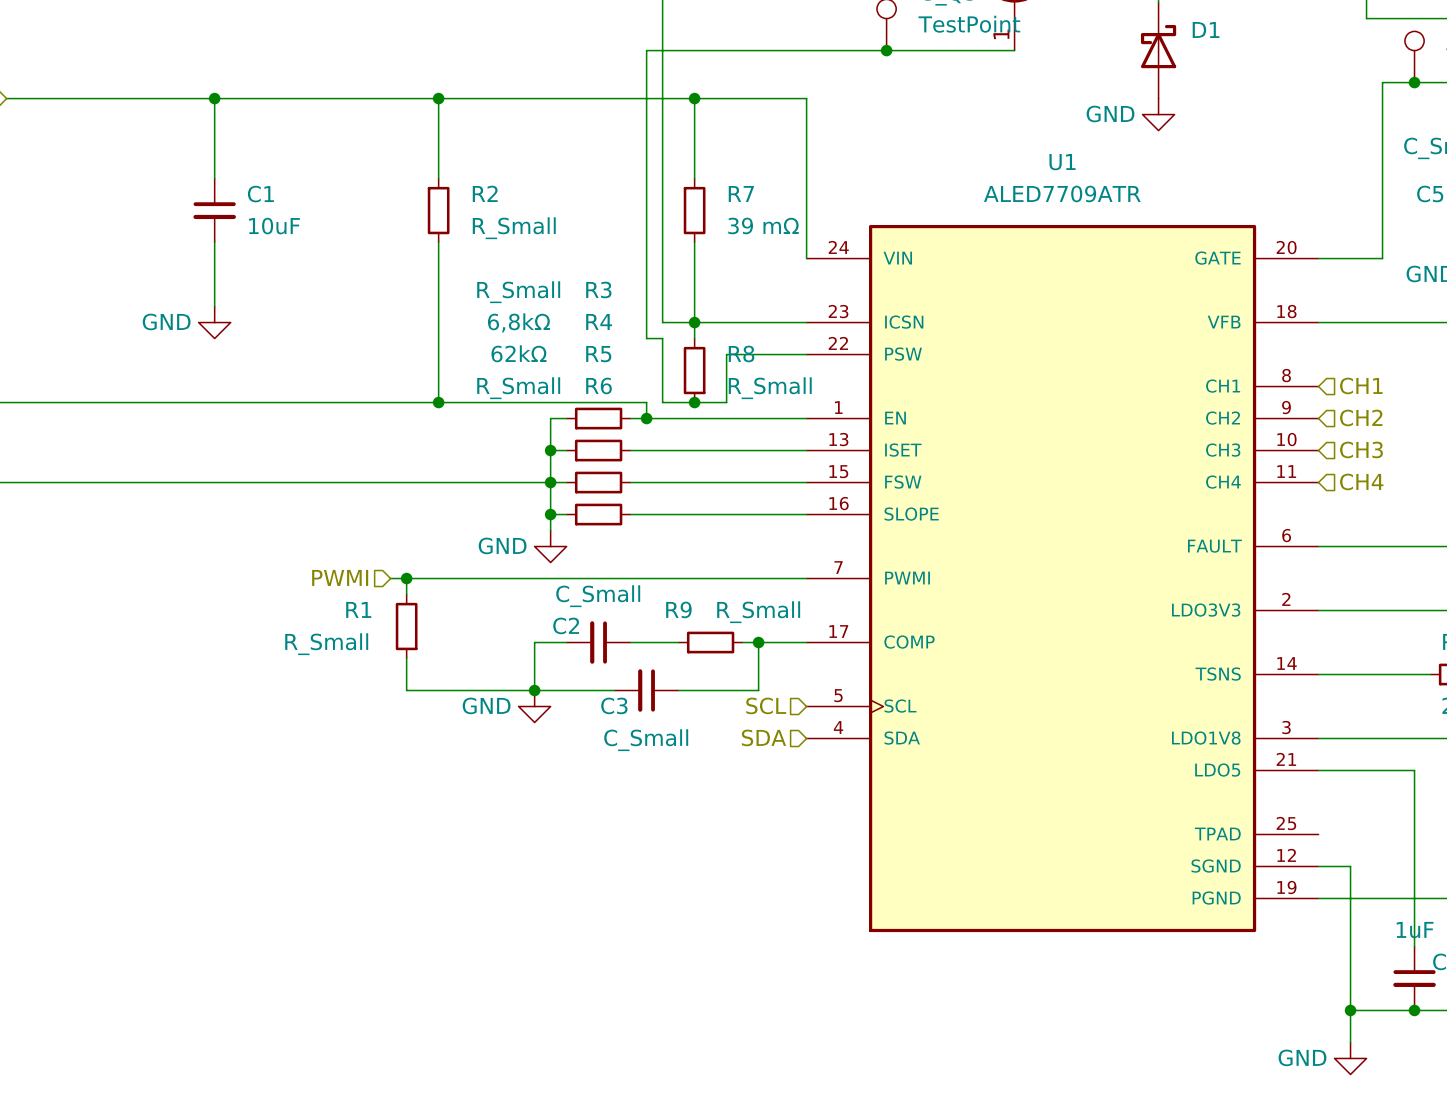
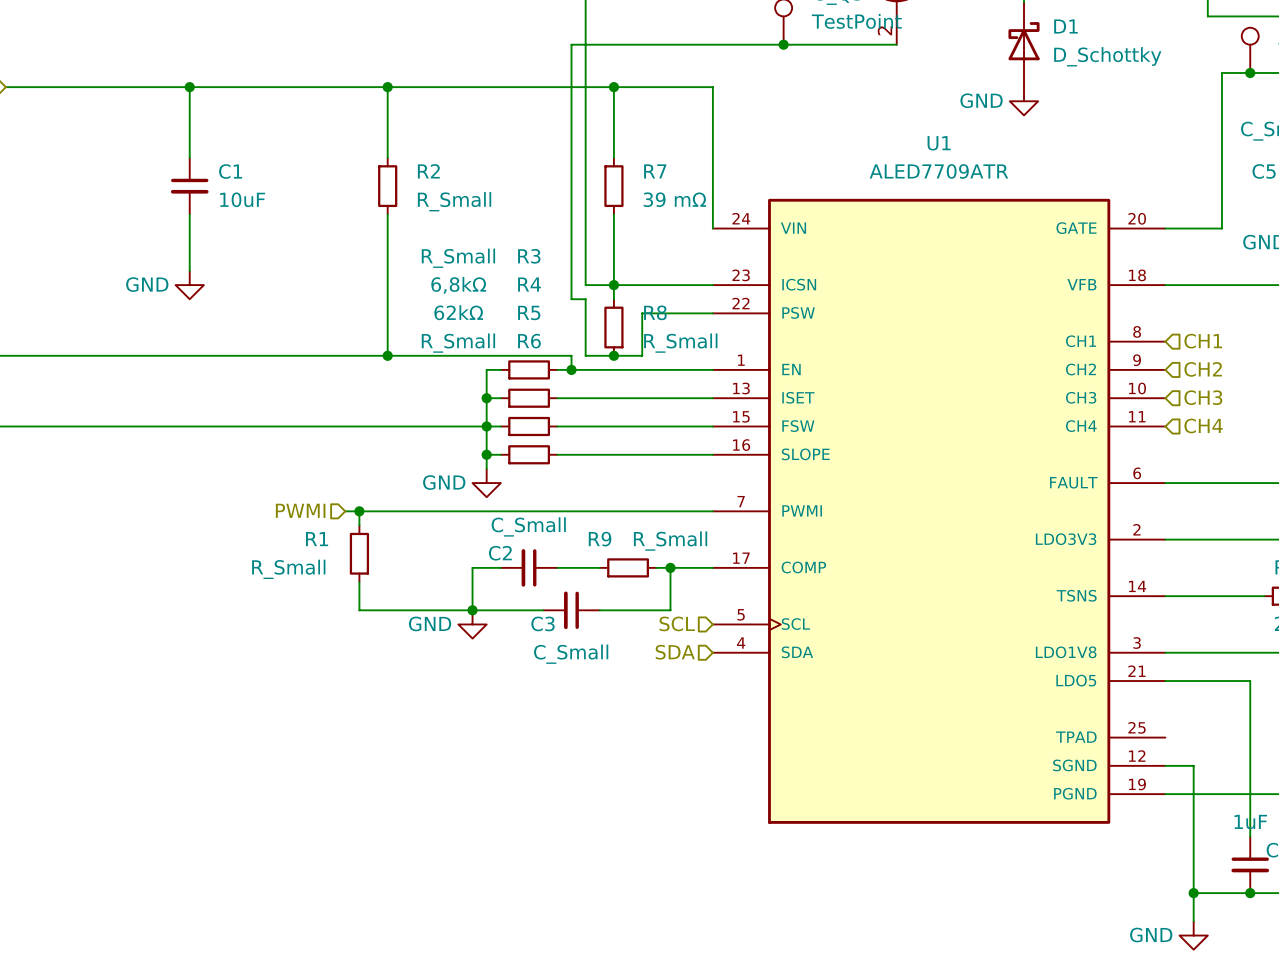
part pin number: 1 (1001, 34) -> 2 (884, 30)
D1 value: none -> D_Schottky (1107, 56)

